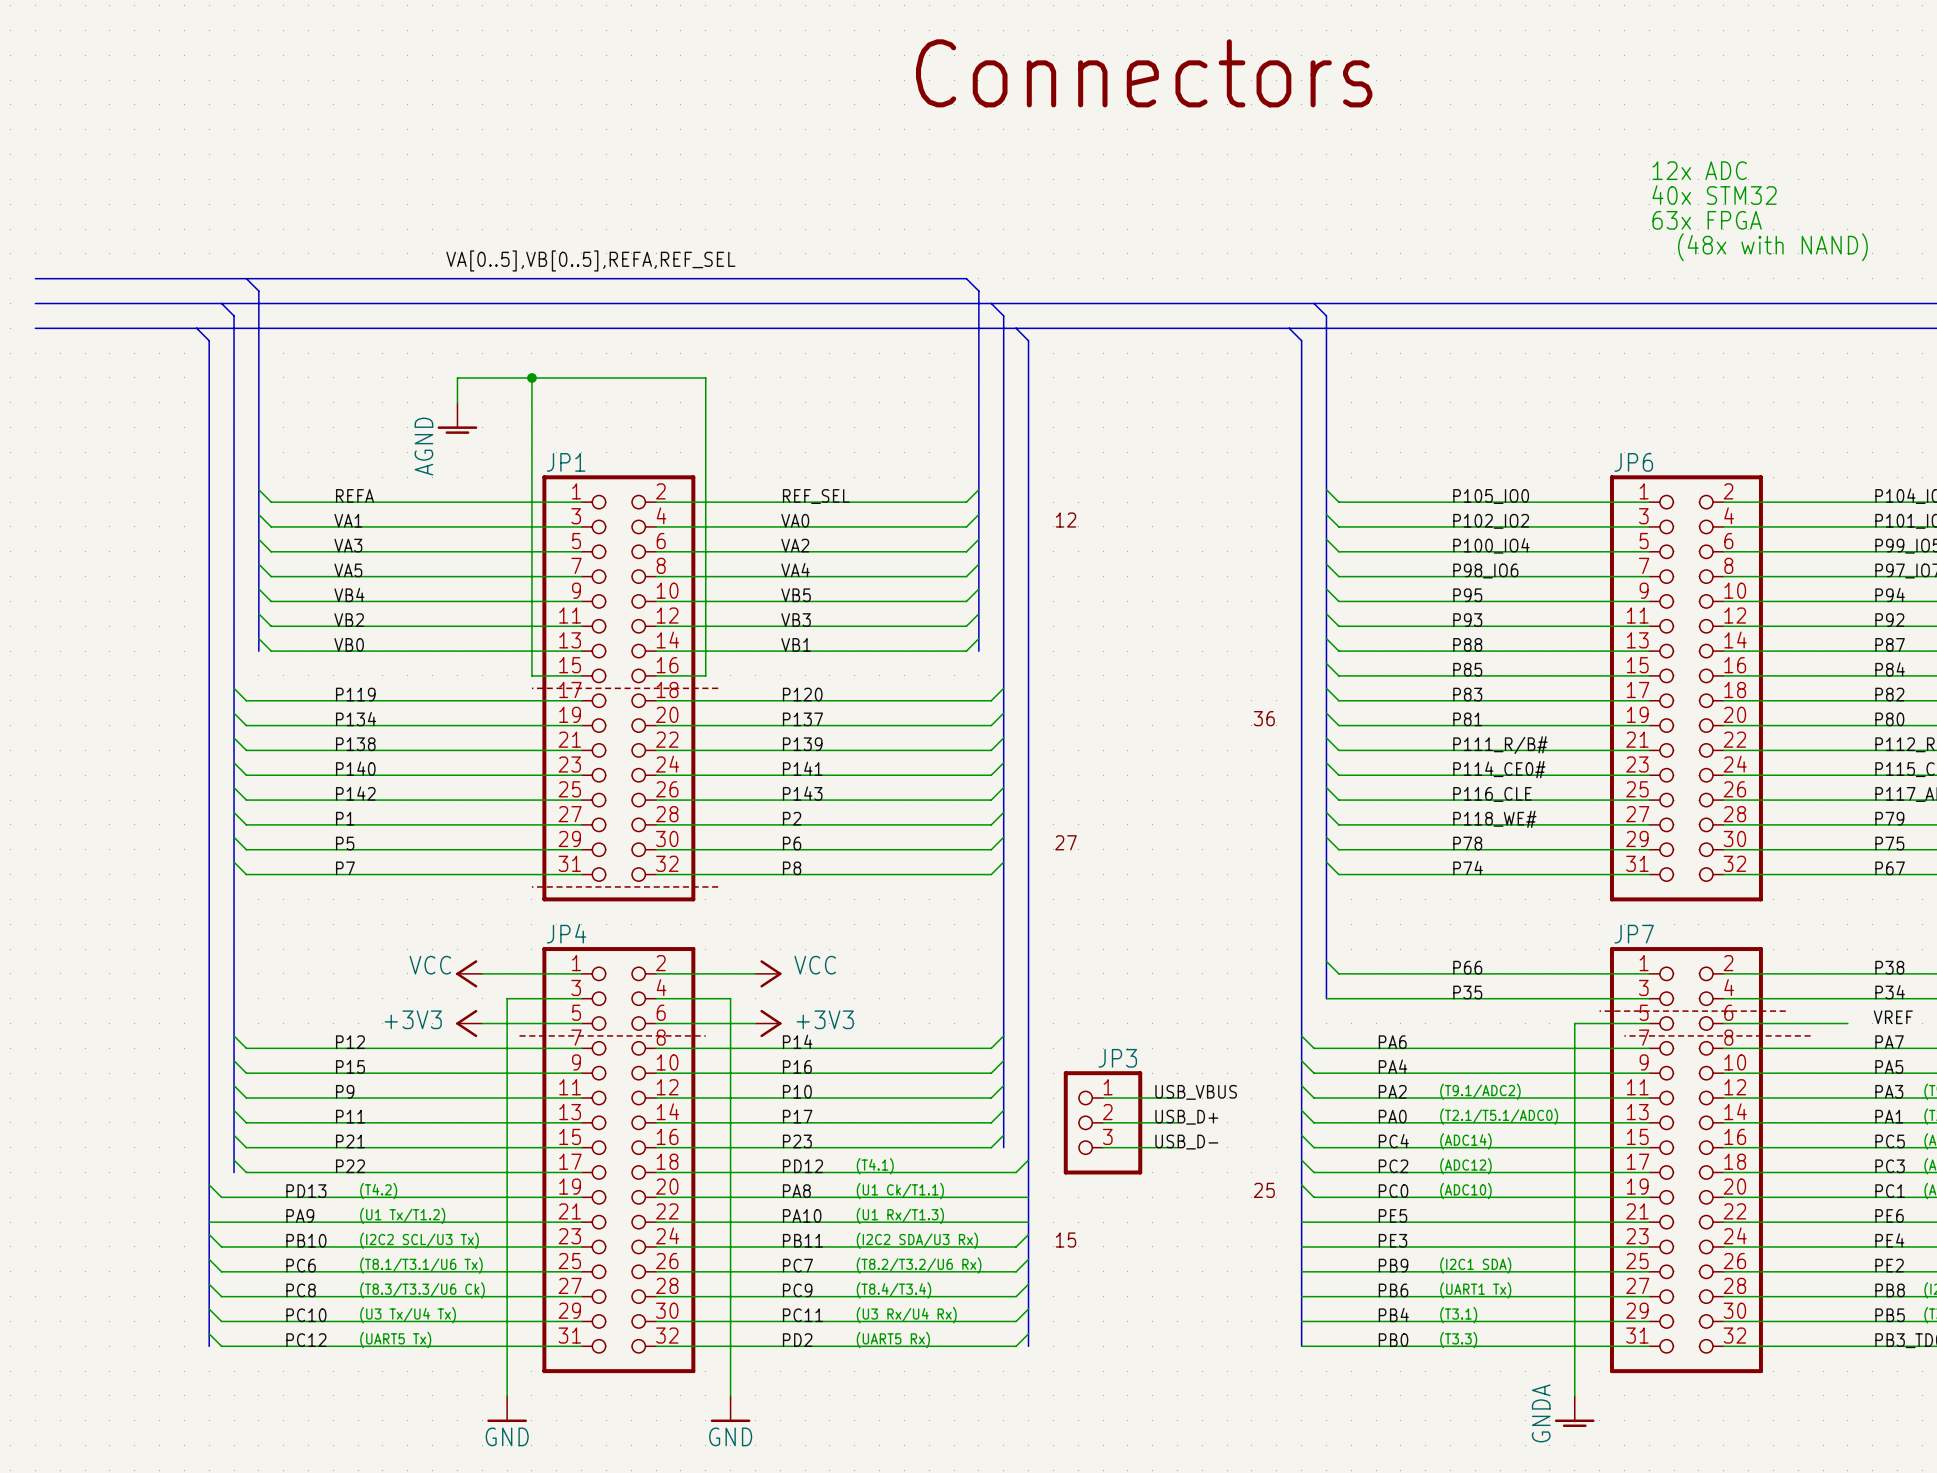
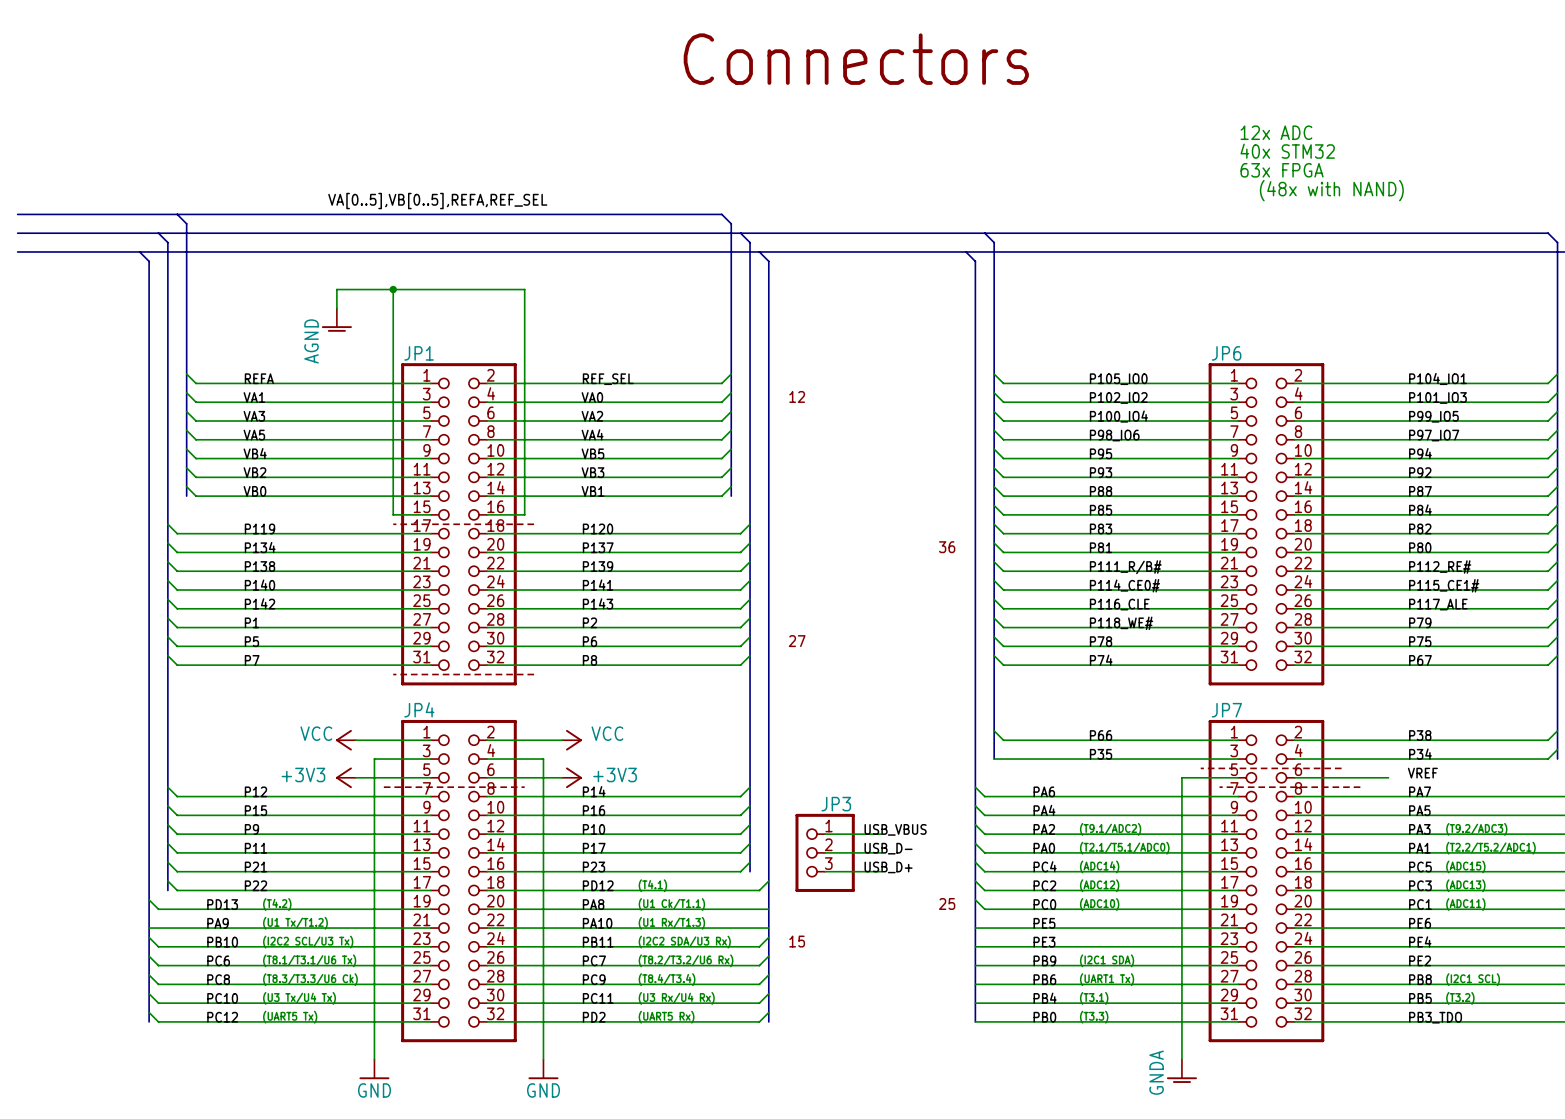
label: USB_D+ (1186, 1117) -> USB_D- (888, 848)
label: USB_D- (1186, 1142) -> USB_D+ (888, 867)

